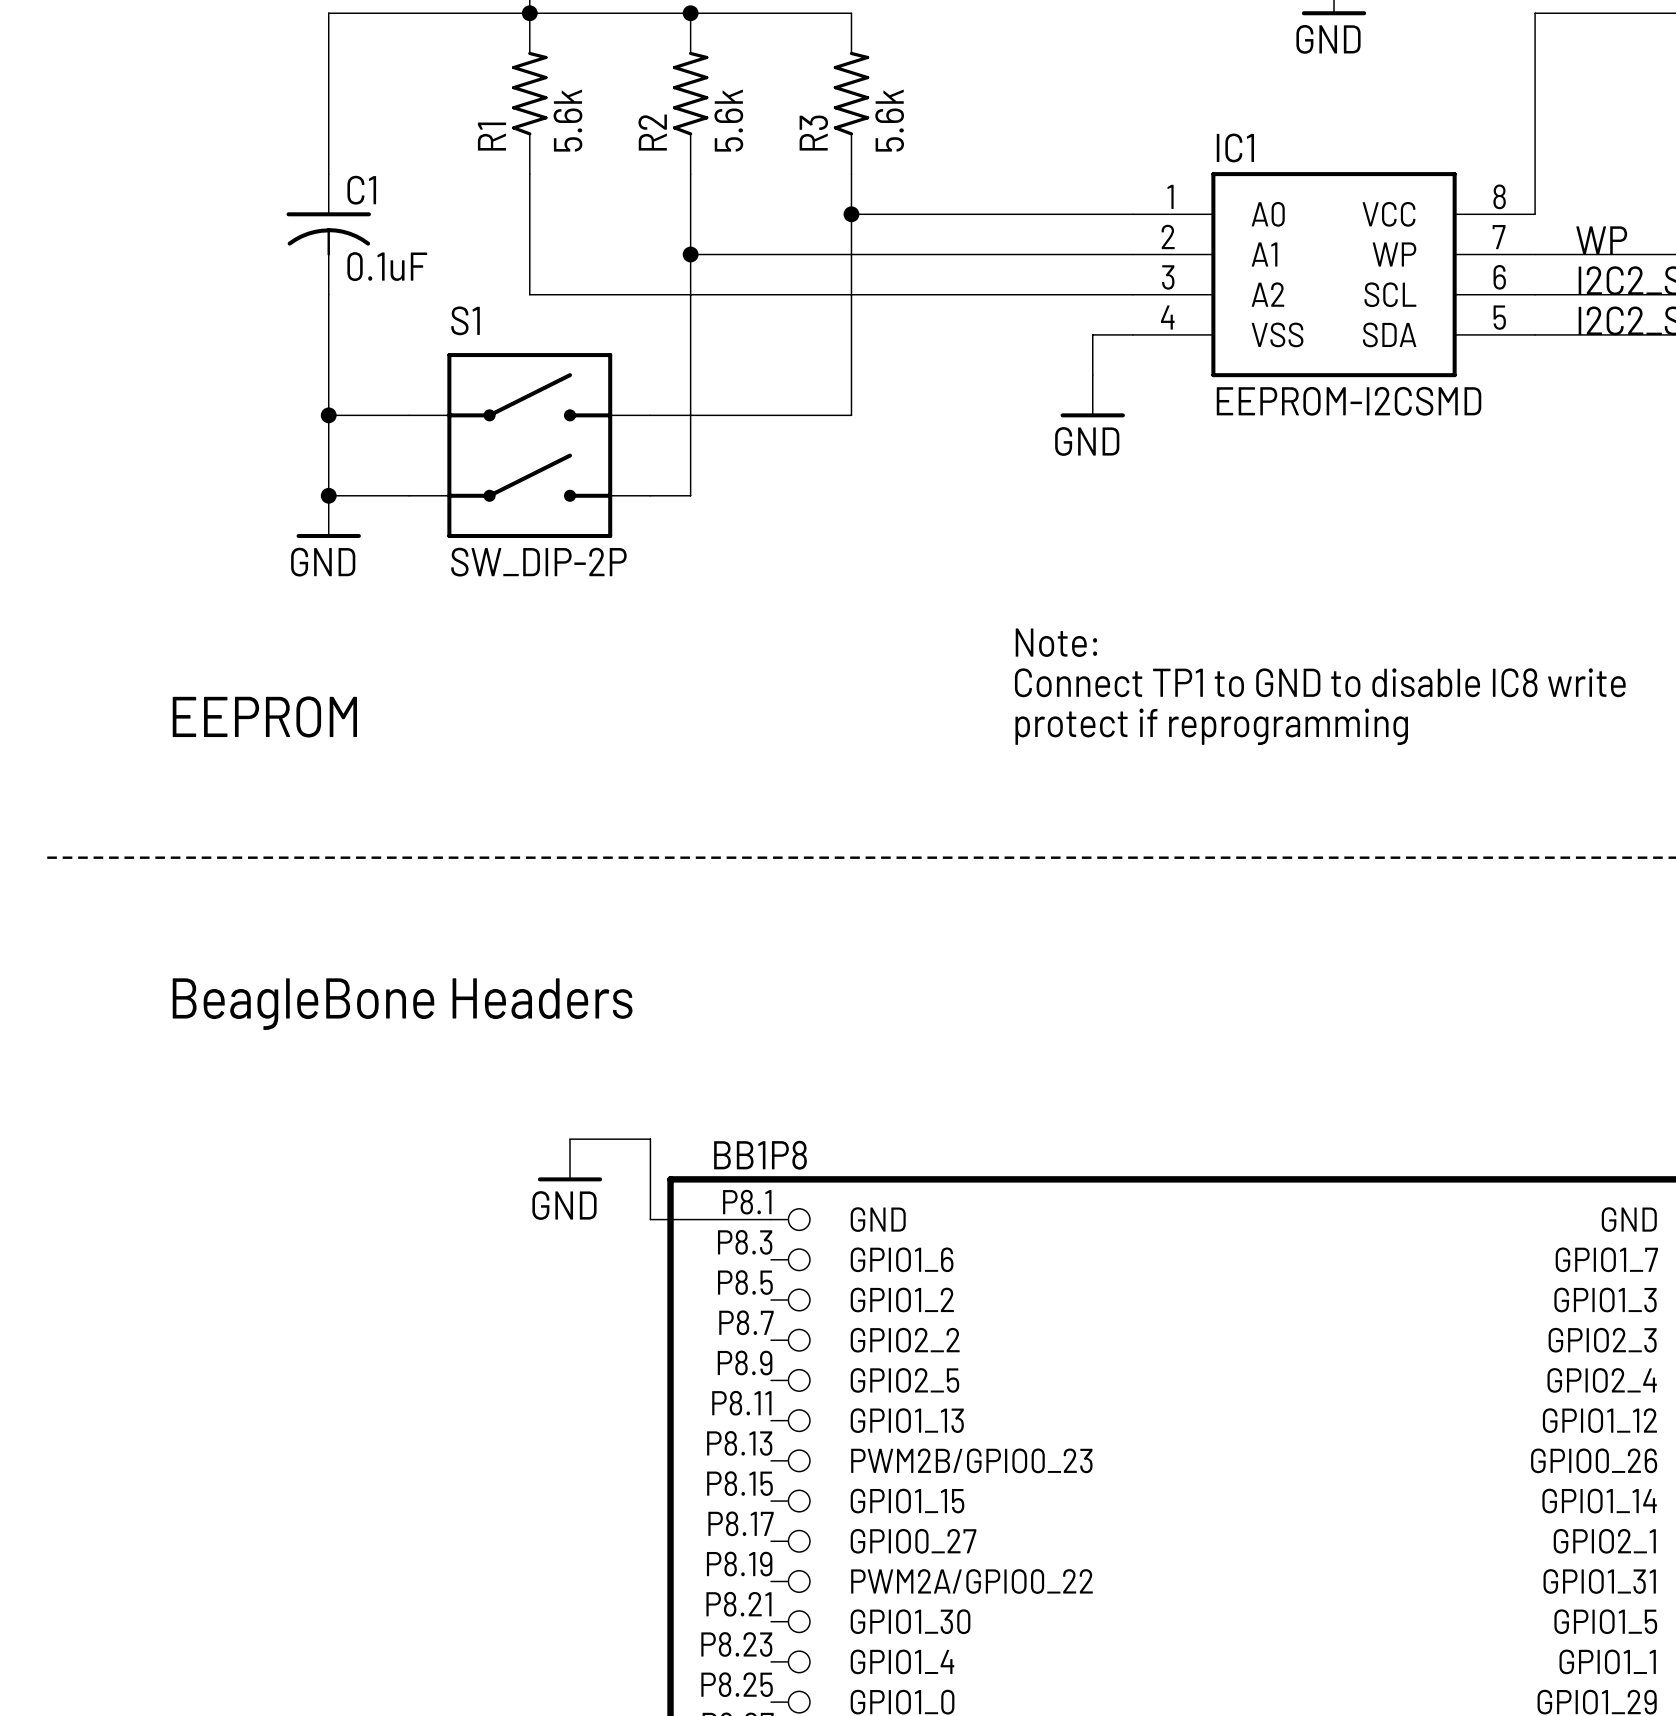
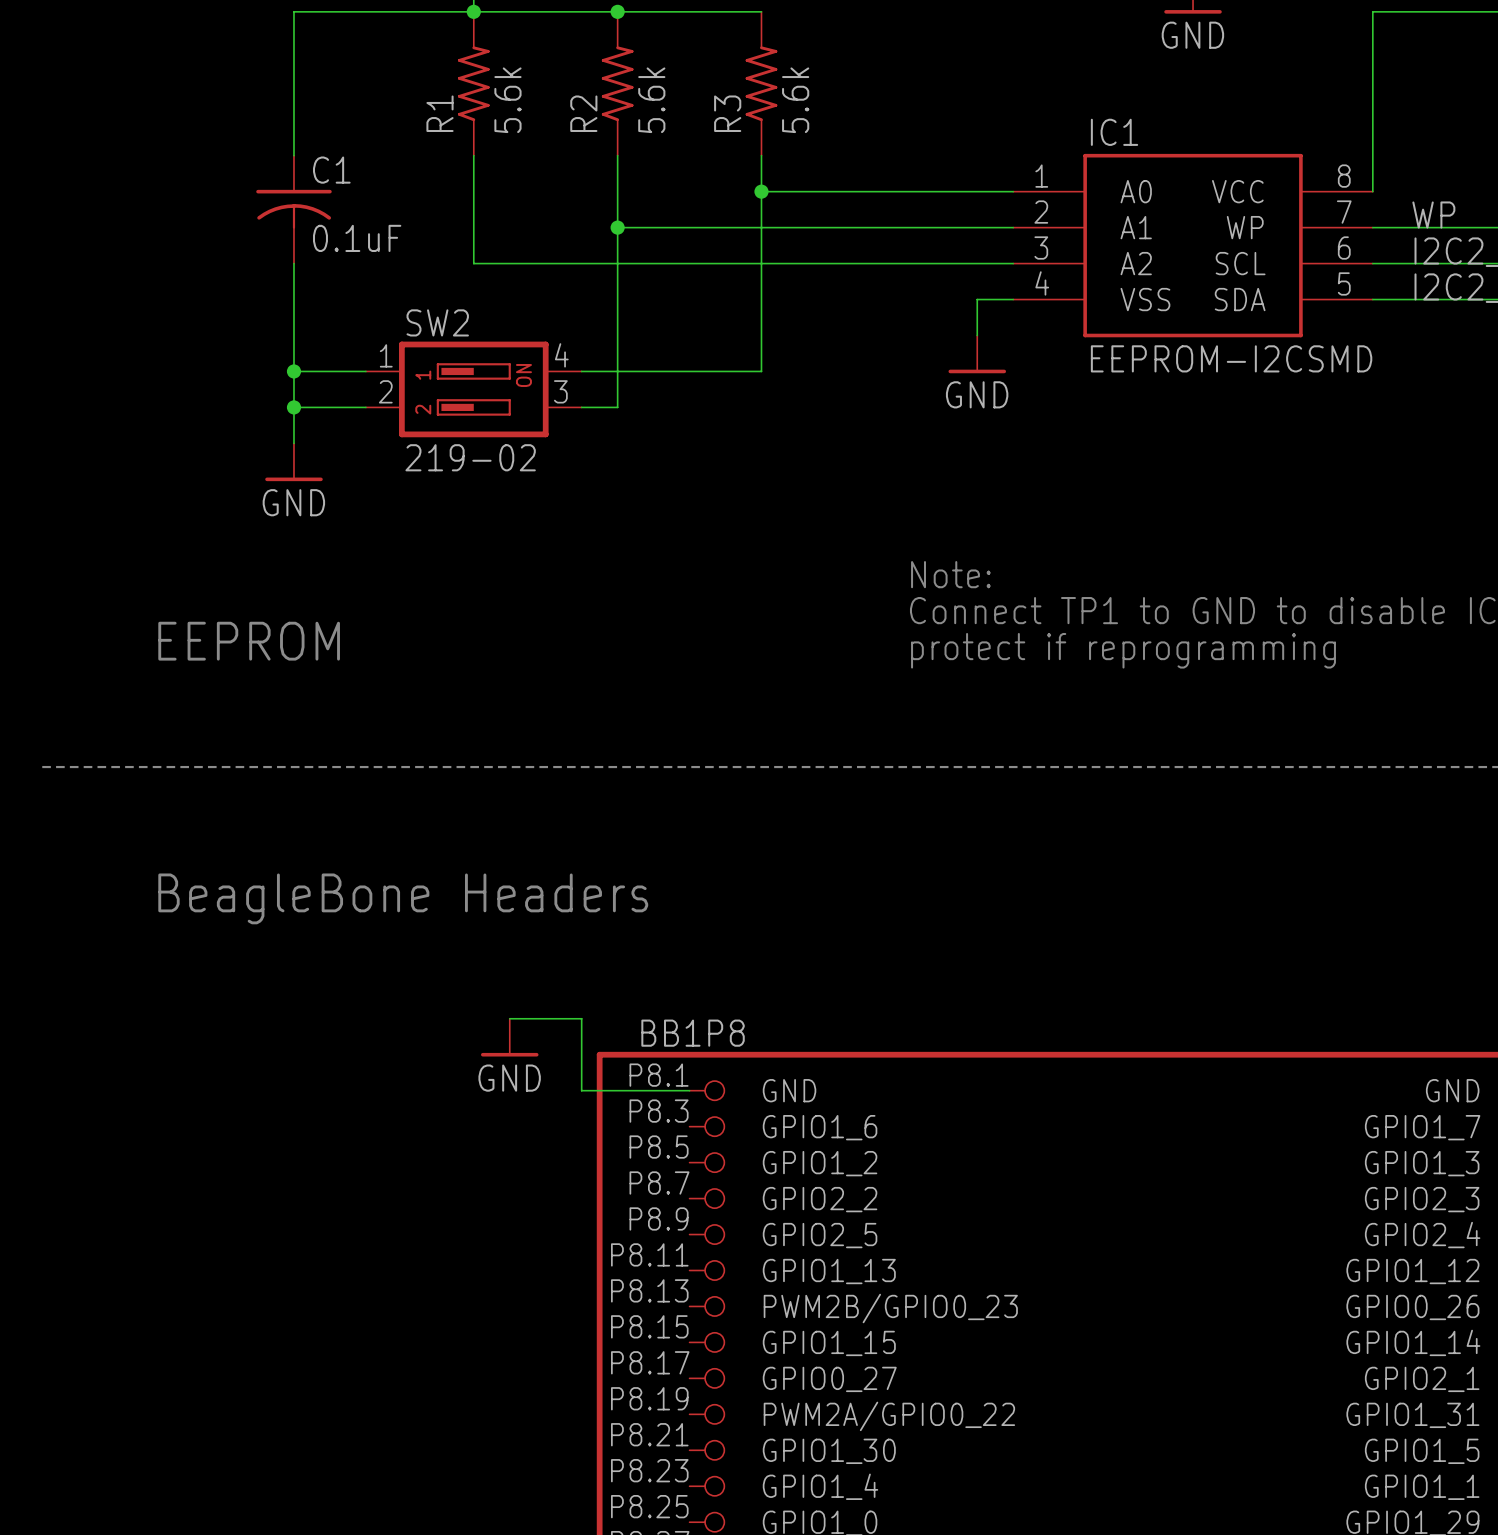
SW2: none -> 219-02 (473, 389)
S1: SW_DIP-2P (529, 445) -> none
wire: (690, 455) (690, 495) (650, 495) -> (617, 407) (581, 407)
wire: (328, 495) (409, 495) -> (293, 407) (365, 407)
junction position: (328, 495) -> (293, 407)

